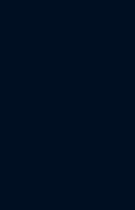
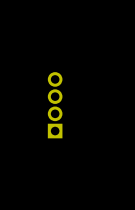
part: none -> (55, 105)

